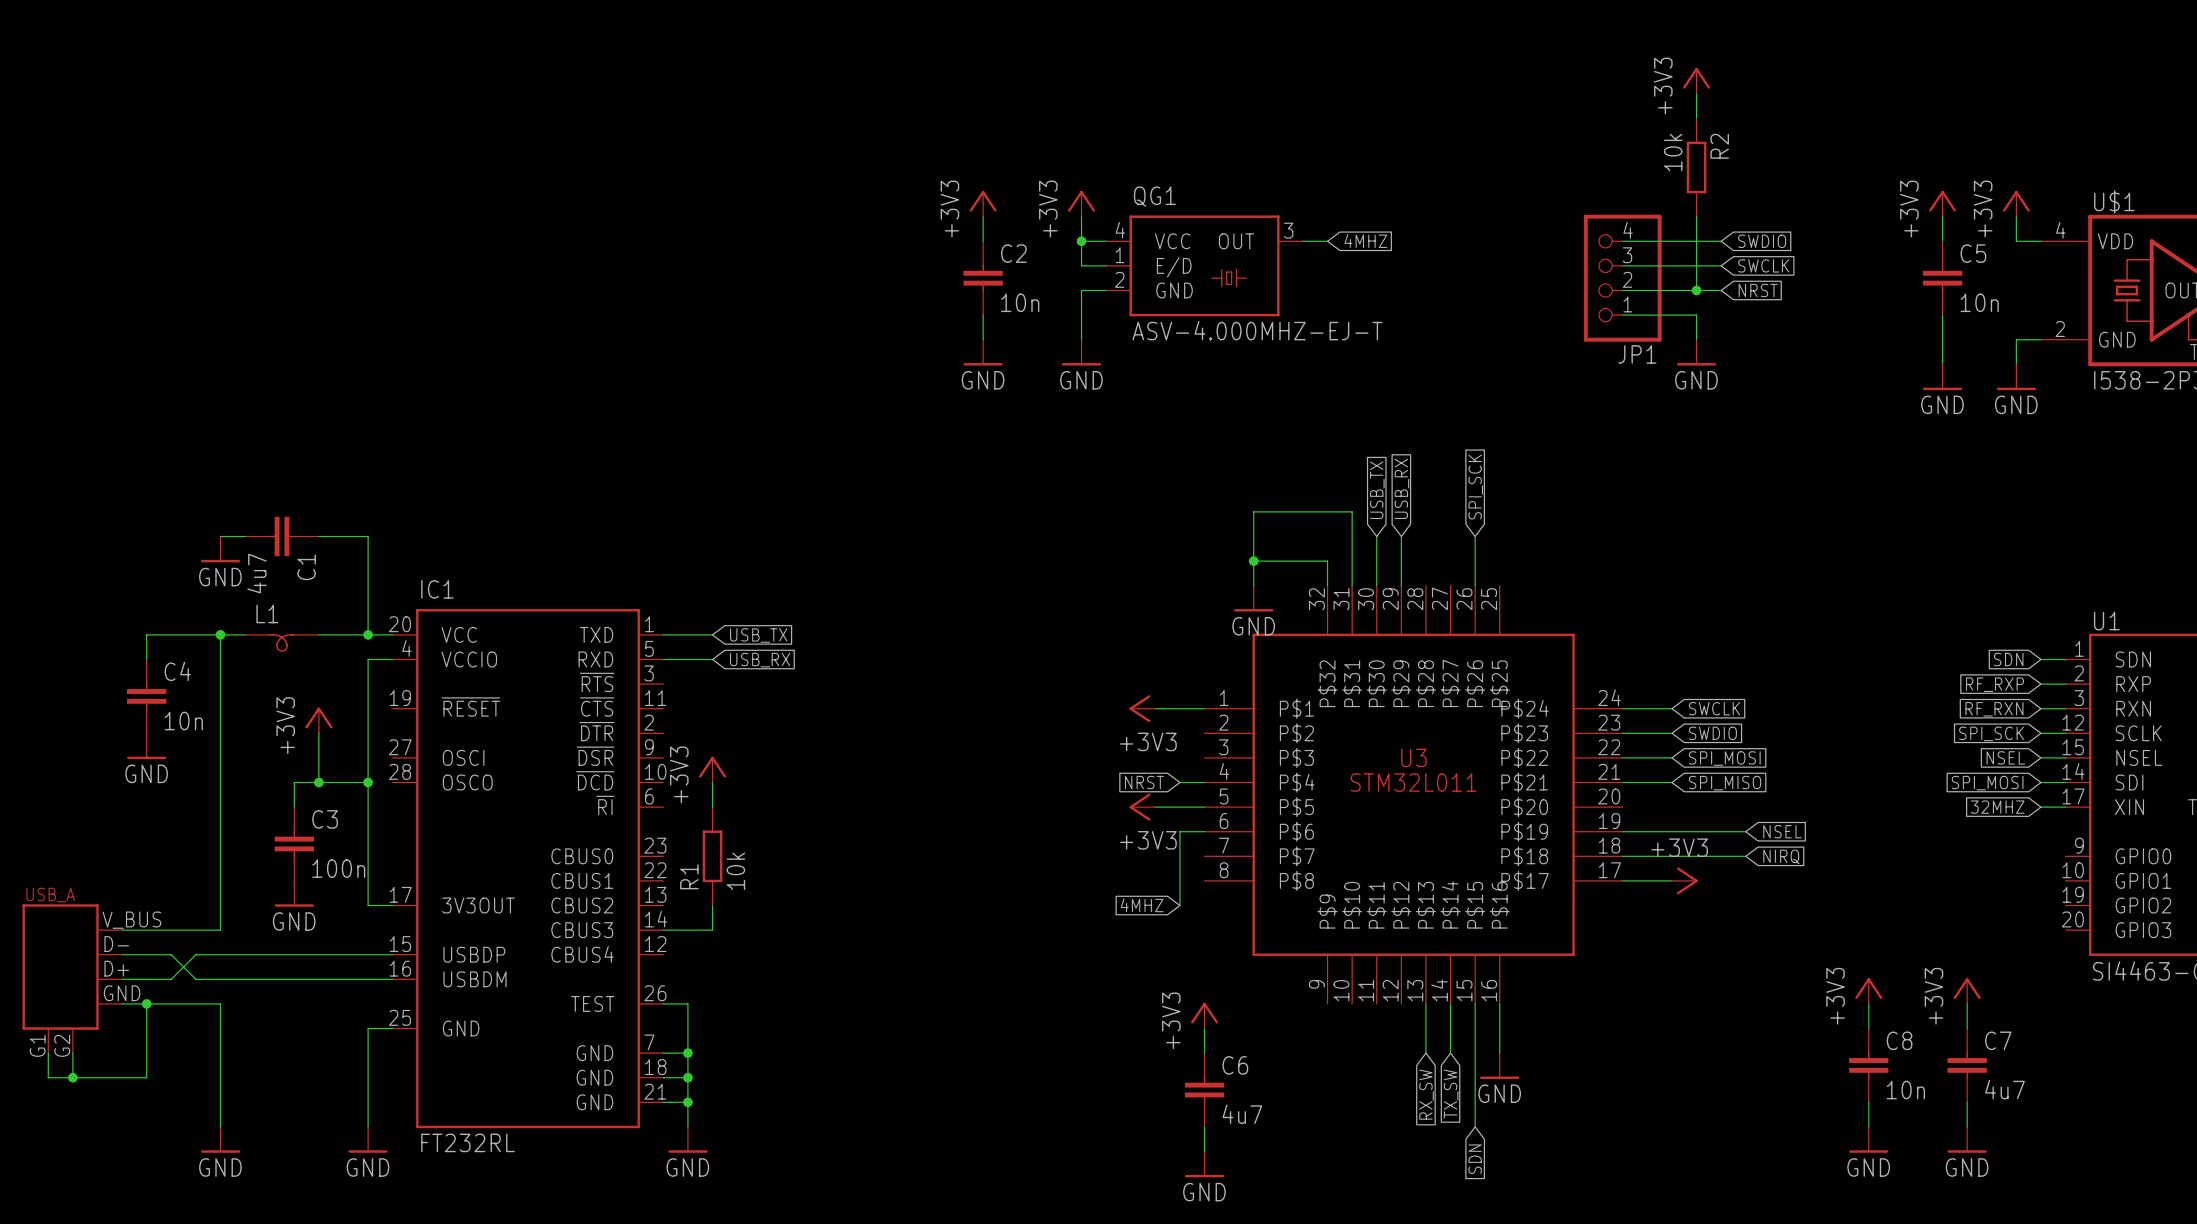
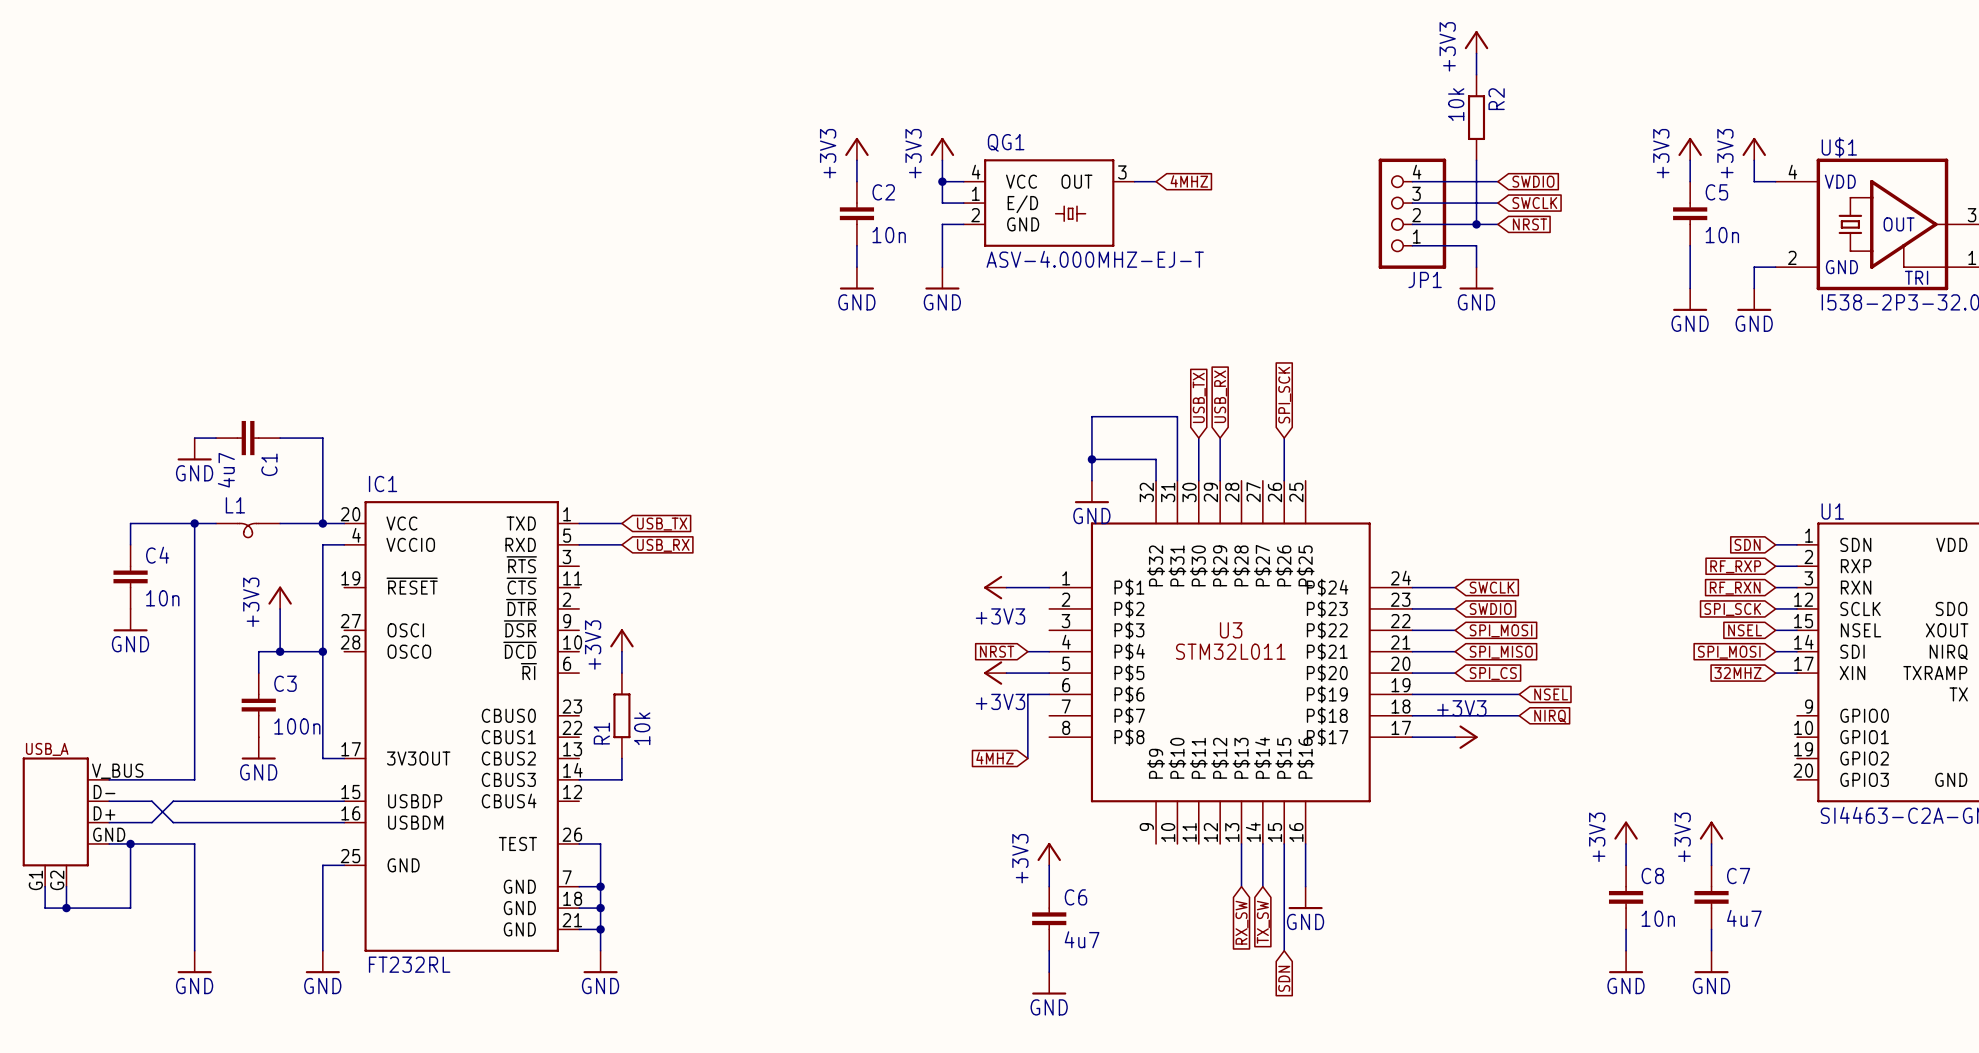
wire: none -> (1412, 673) (1455, 673)
global label: none -> SPI_CS (1493, 673)

